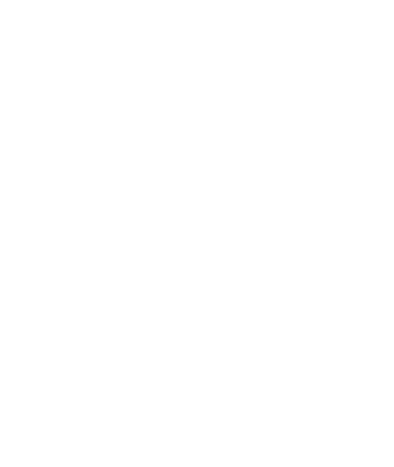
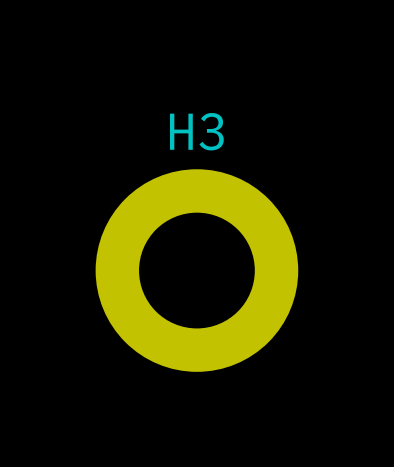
H3: none -> (196, 270)

